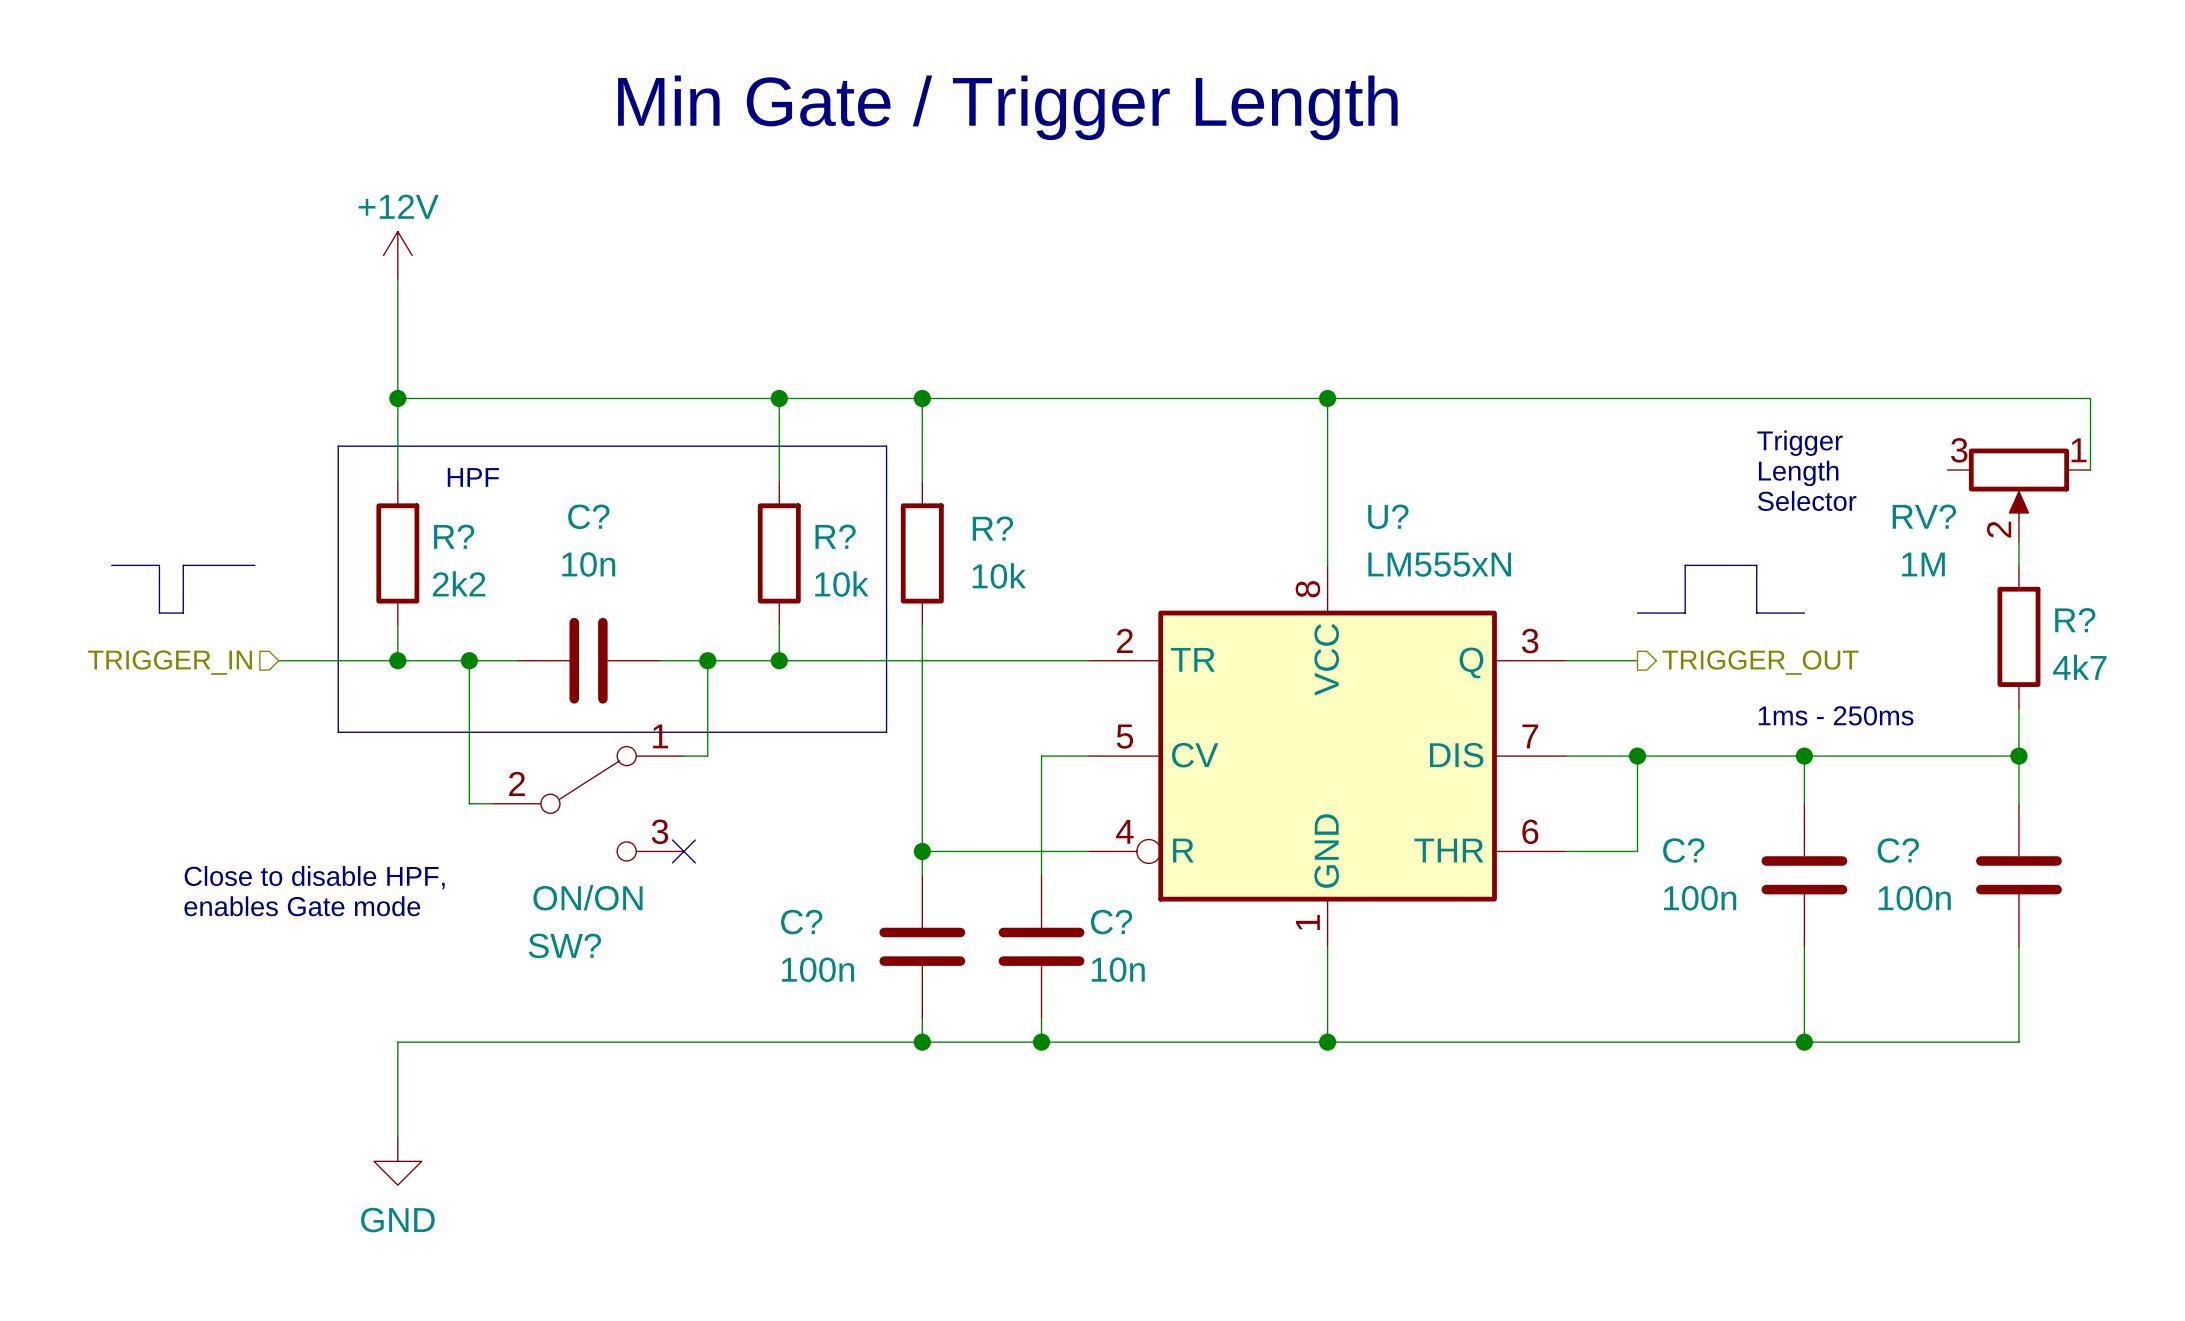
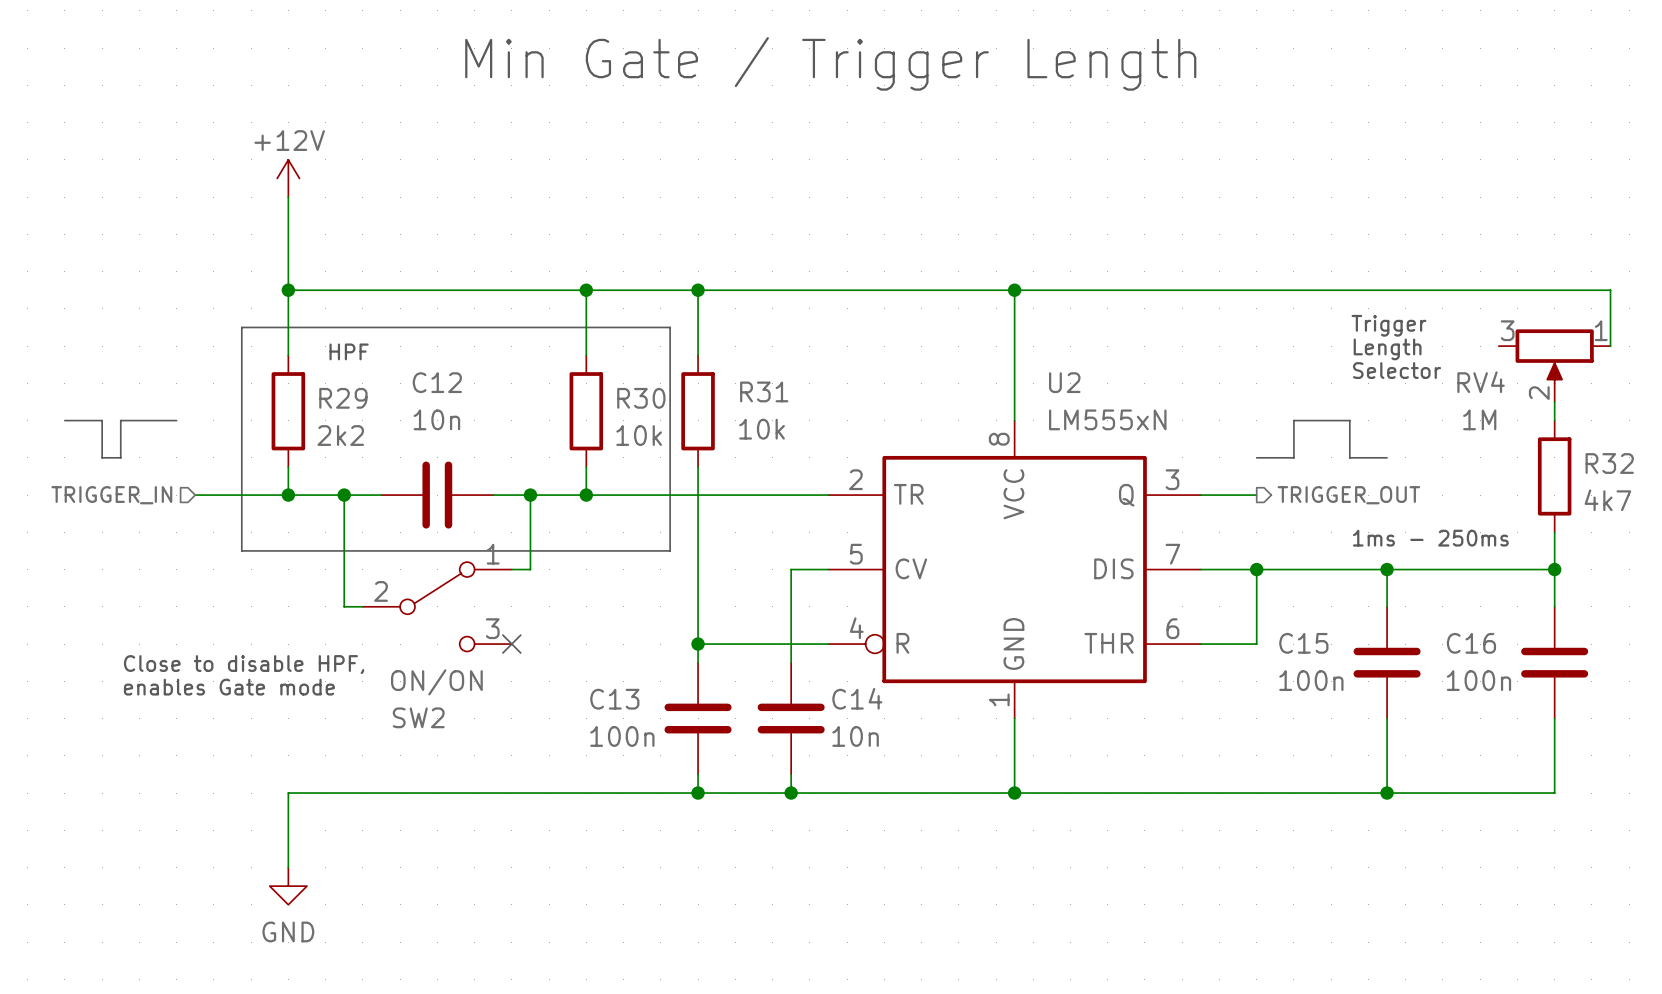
C? name: C? (588, 516) -> C12 (437, 382)
U? name: U? (1388, 516) -> U2 (1064, 382)
RV? name: RV? (1924, 516) -> RV4 (1481, 382)
R? name: R? (992, 528) -> R31 (764, 391)
R? name: R? (454, 536) -> R29 (343, 398)
R? name: R? (835, 536) -> R30 (641, 398)
R? name: R? (2075, 620) -> R32 (1609, 463)
C? name: C? (1683, 850) -> C15 (1303, 643)
C? name: C? (1898, 850) -> C16 (1471, 643)
C? name: C? (801, 922) -> C13 (614, 699)
C? name: C? (1111, 922) -> C14 (857, 698)
SW? name: SW? (564, 945) -> SW2 (418, 717)

